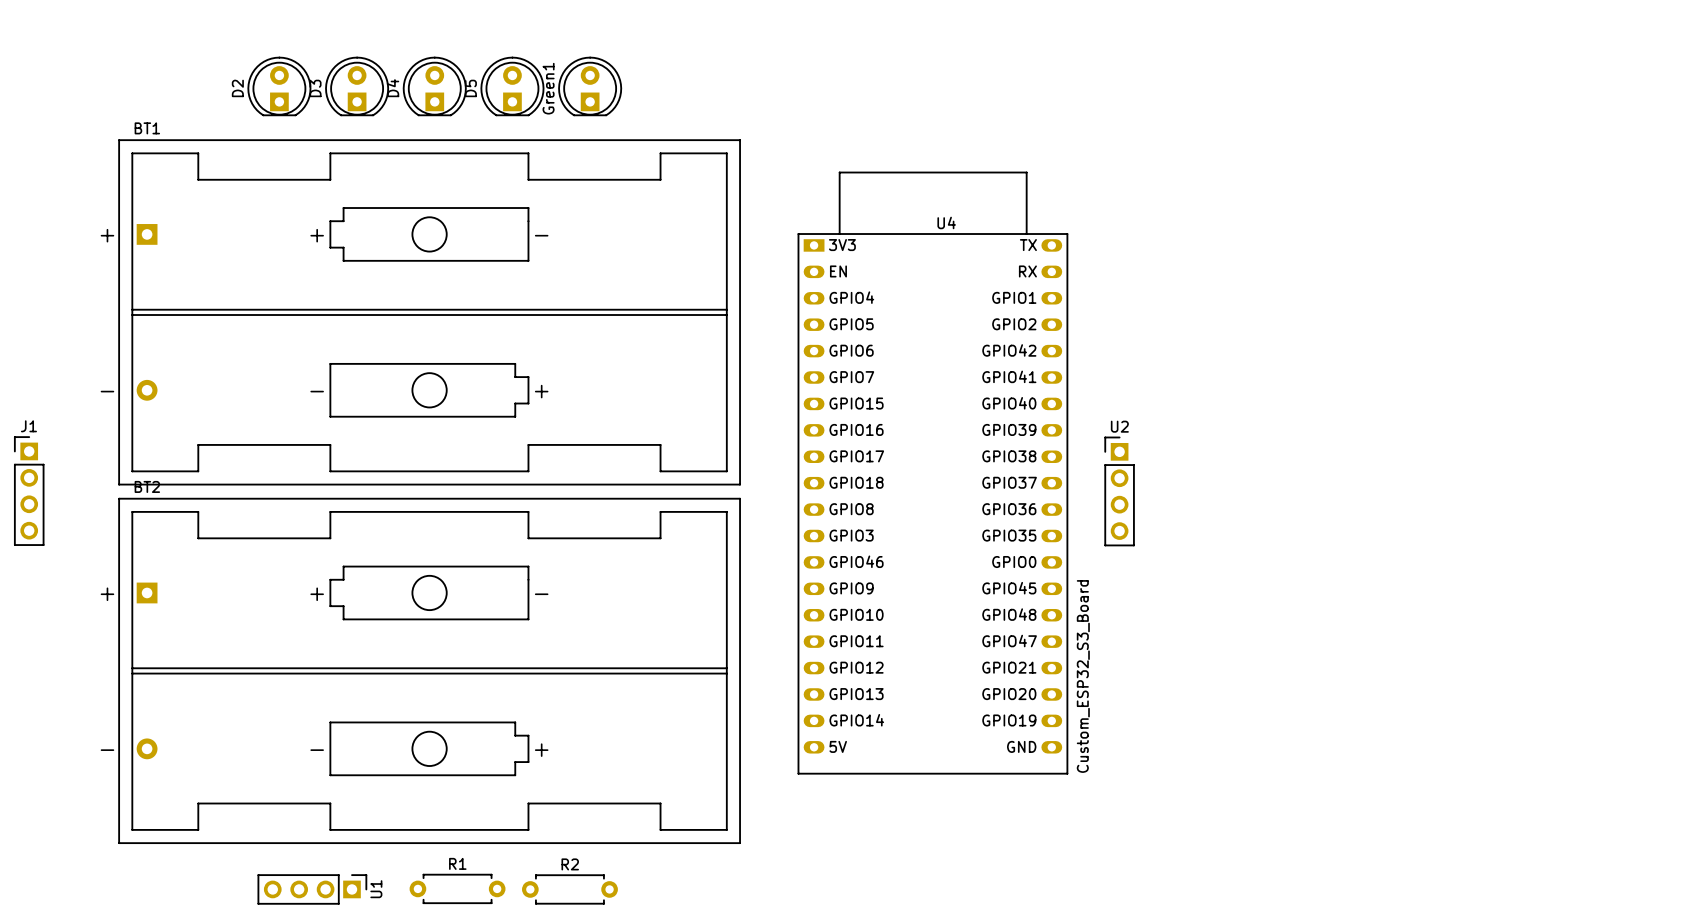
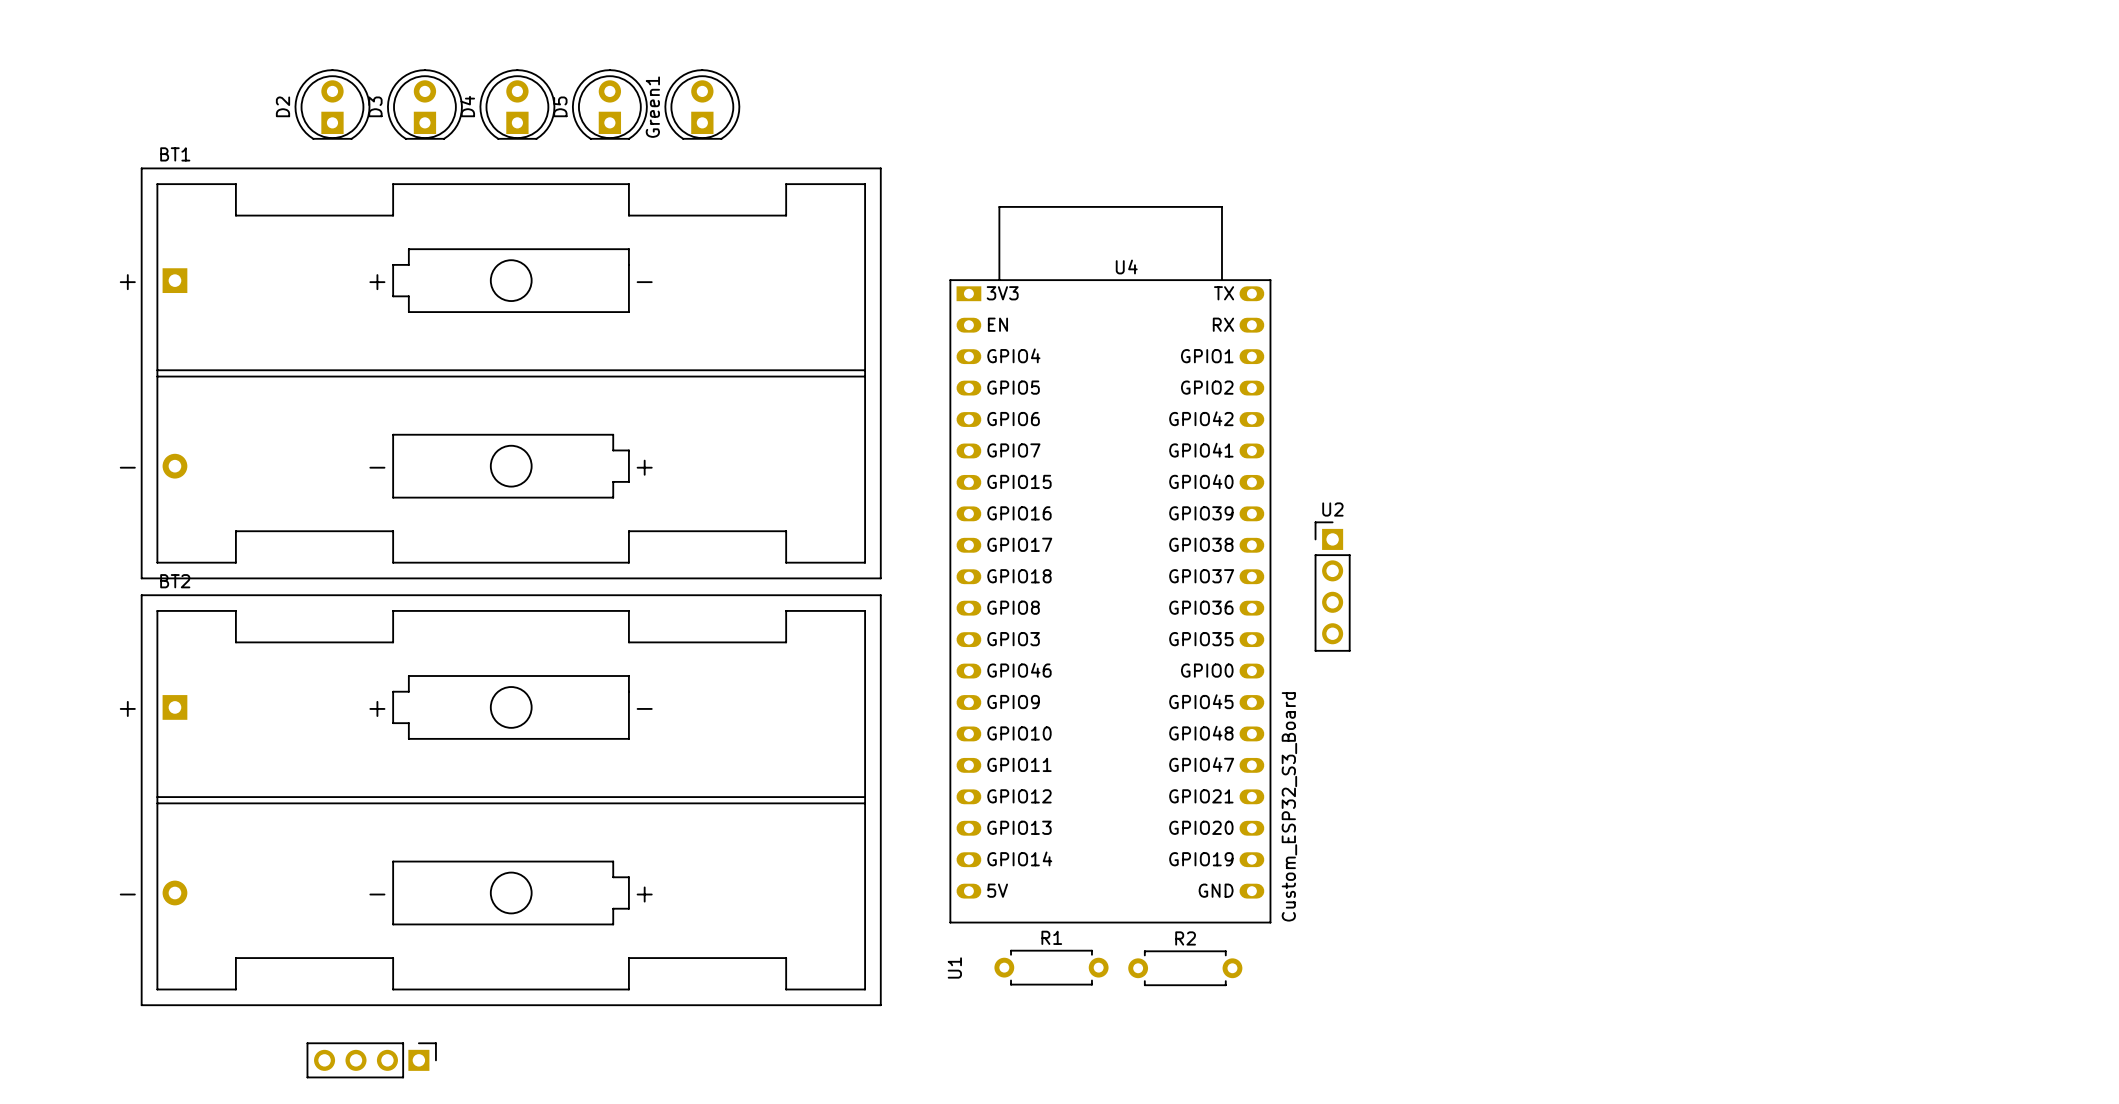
J1: (29, 491) -> none
R1 position: (457, 888) -> (1051, 967)
U1 name position: U1 (376, 889) -> U1 (954, 967)
R2 position: (569, 889) -> (1185, 968)

